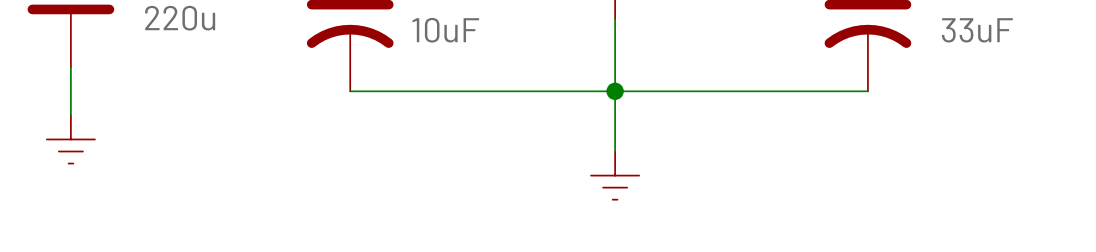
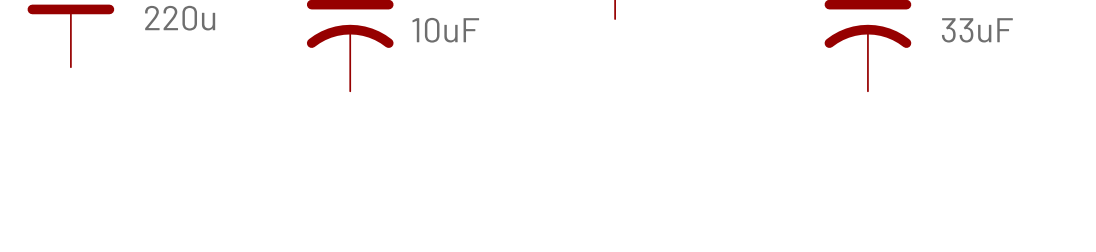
wire: (615, 19) (615, 151) -> none
wire: (70, 67) (70, 115) -> none
wire: (350, 91) (867, 91) -> none
junction: (615, 91) -> none
power symbol: (70, 139) -> none
power symbol: (615, 175) -> none

